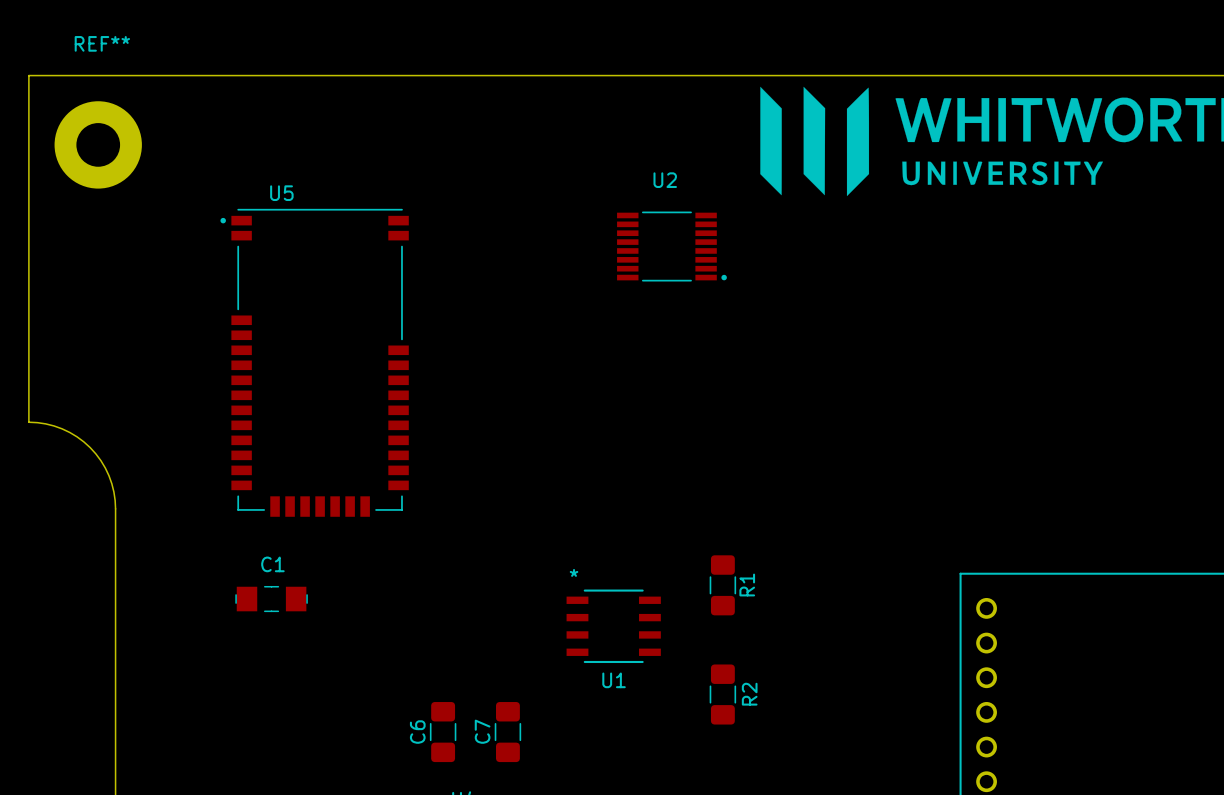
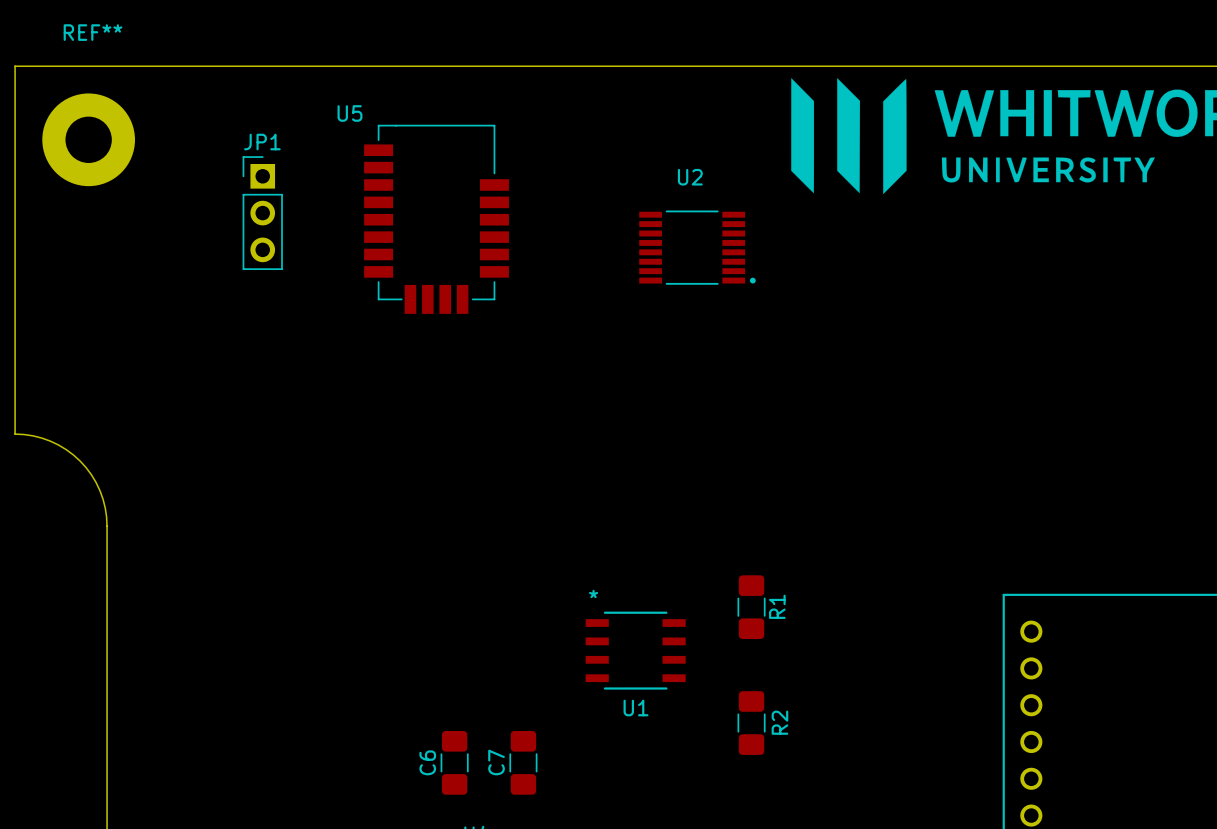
U5 name position: U5 (281, 193) -> U5 (349, 113)
U5 footprint: [220, 208, 409, 517] -> [364, 124, 509, 314]
JP1: none -> (262, 213)
C1: (271, 599) -> none

